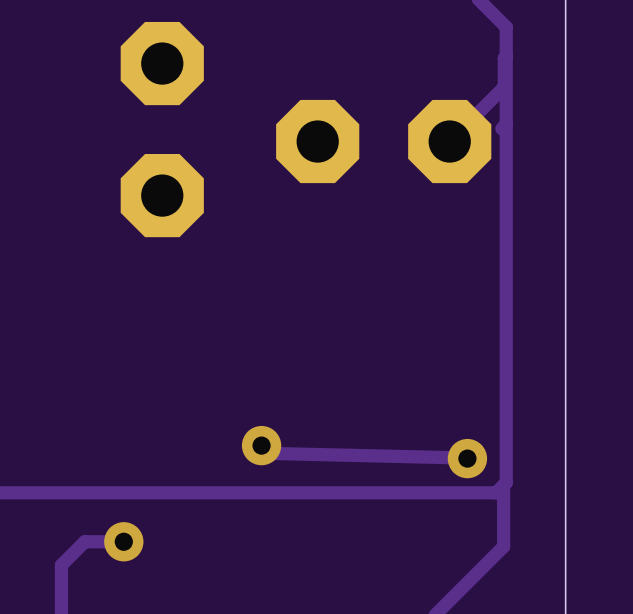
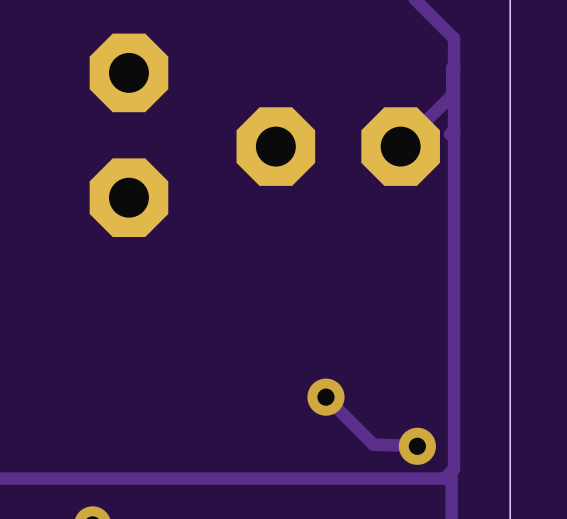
track: (261, 445) (269, 453) (421, 456) -> (325, 397) (373, 444)
via position: (261, 445) -> (325, 397)

